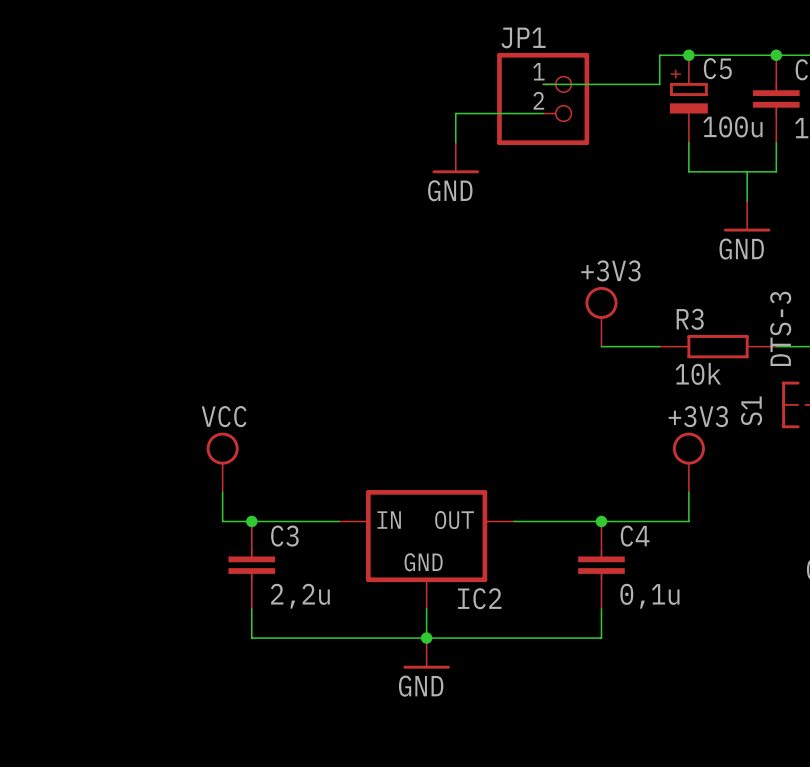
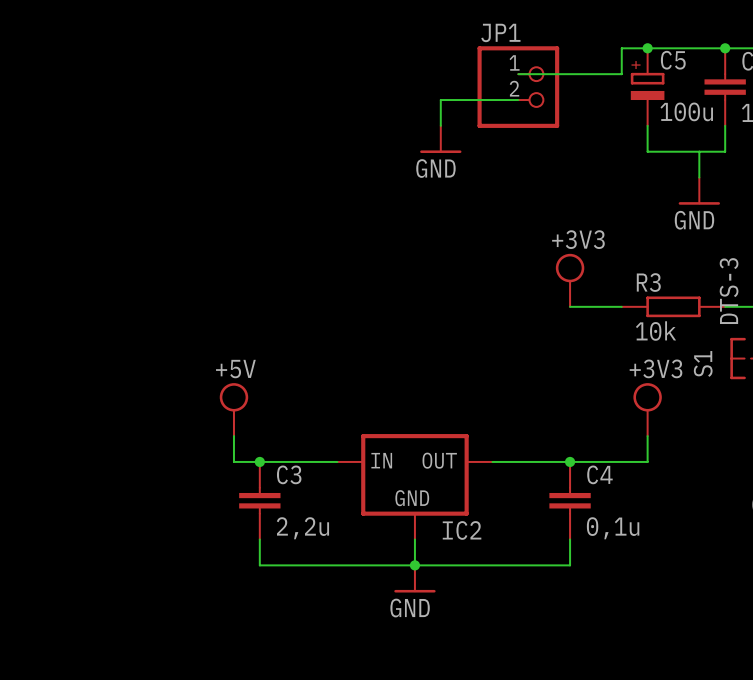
power symbol: VCC (222, 462) -> +5V (233, 409)

